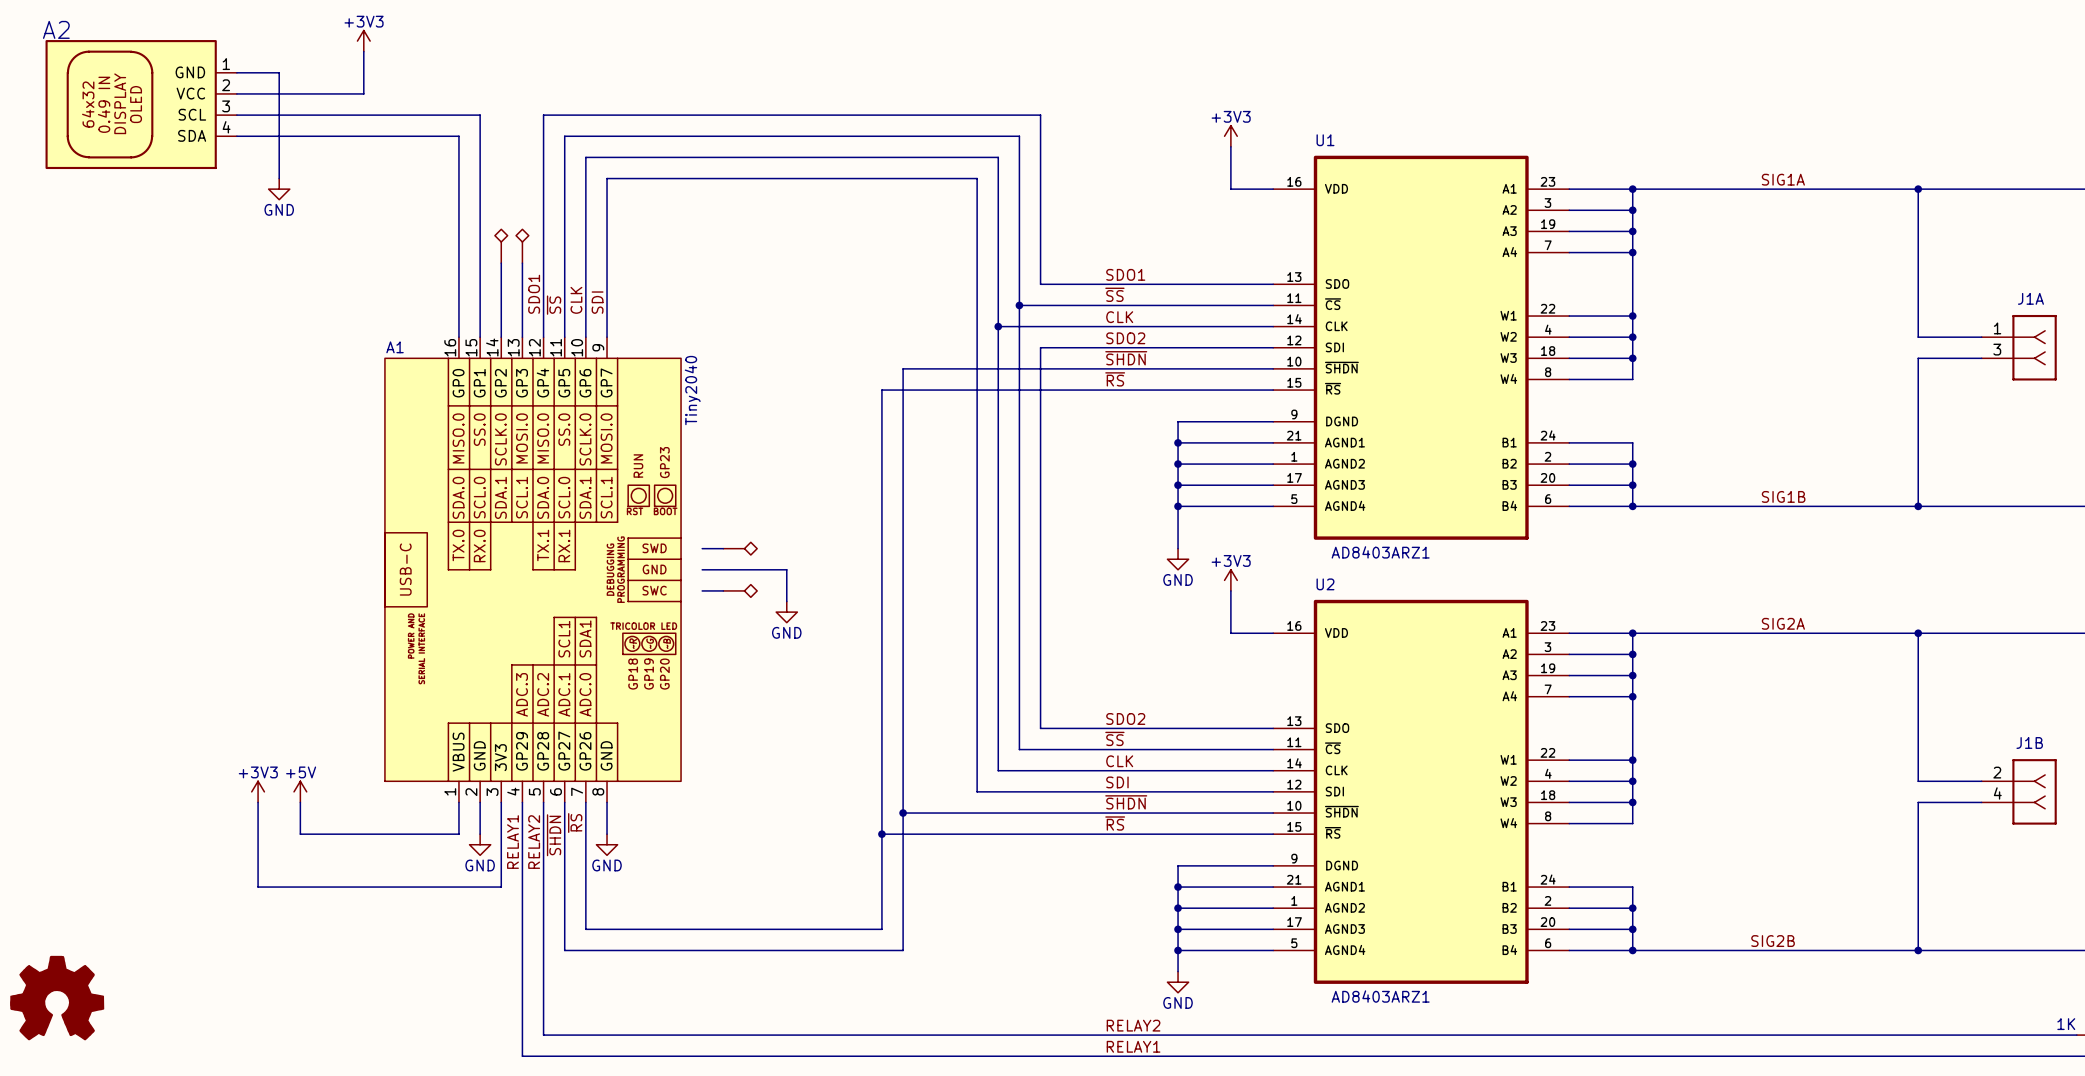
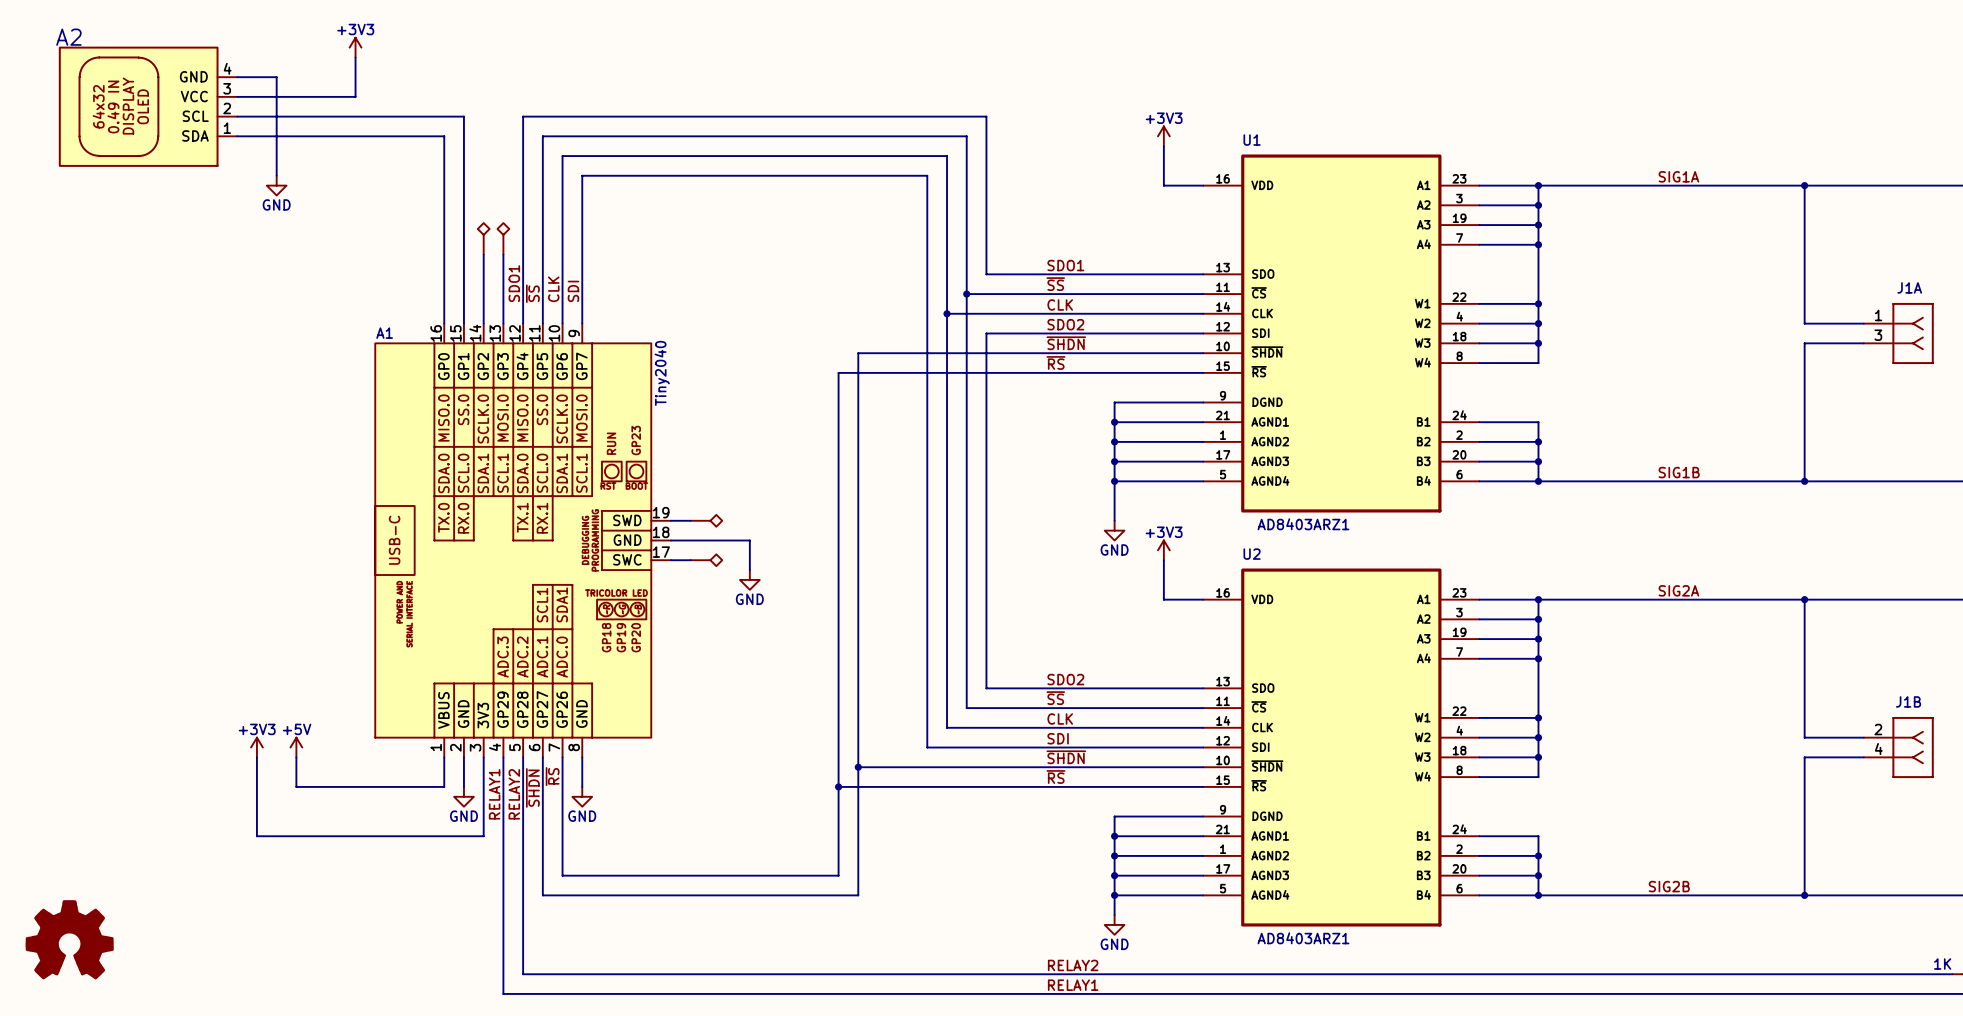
A2 pin number: 1 (226, 64) -> 4 (227, 68)
A2 pin number: 2 (226, 85) -> 3 (227, 88)
A2 pin number: 3 (226, 106) -> 2 (227, 108)
A2 pin number: 4 (226, 127) -> 1 (227, 128)
A1 symbol: [384, 337, 682, 803] -> [375, 323, 671, 758]

